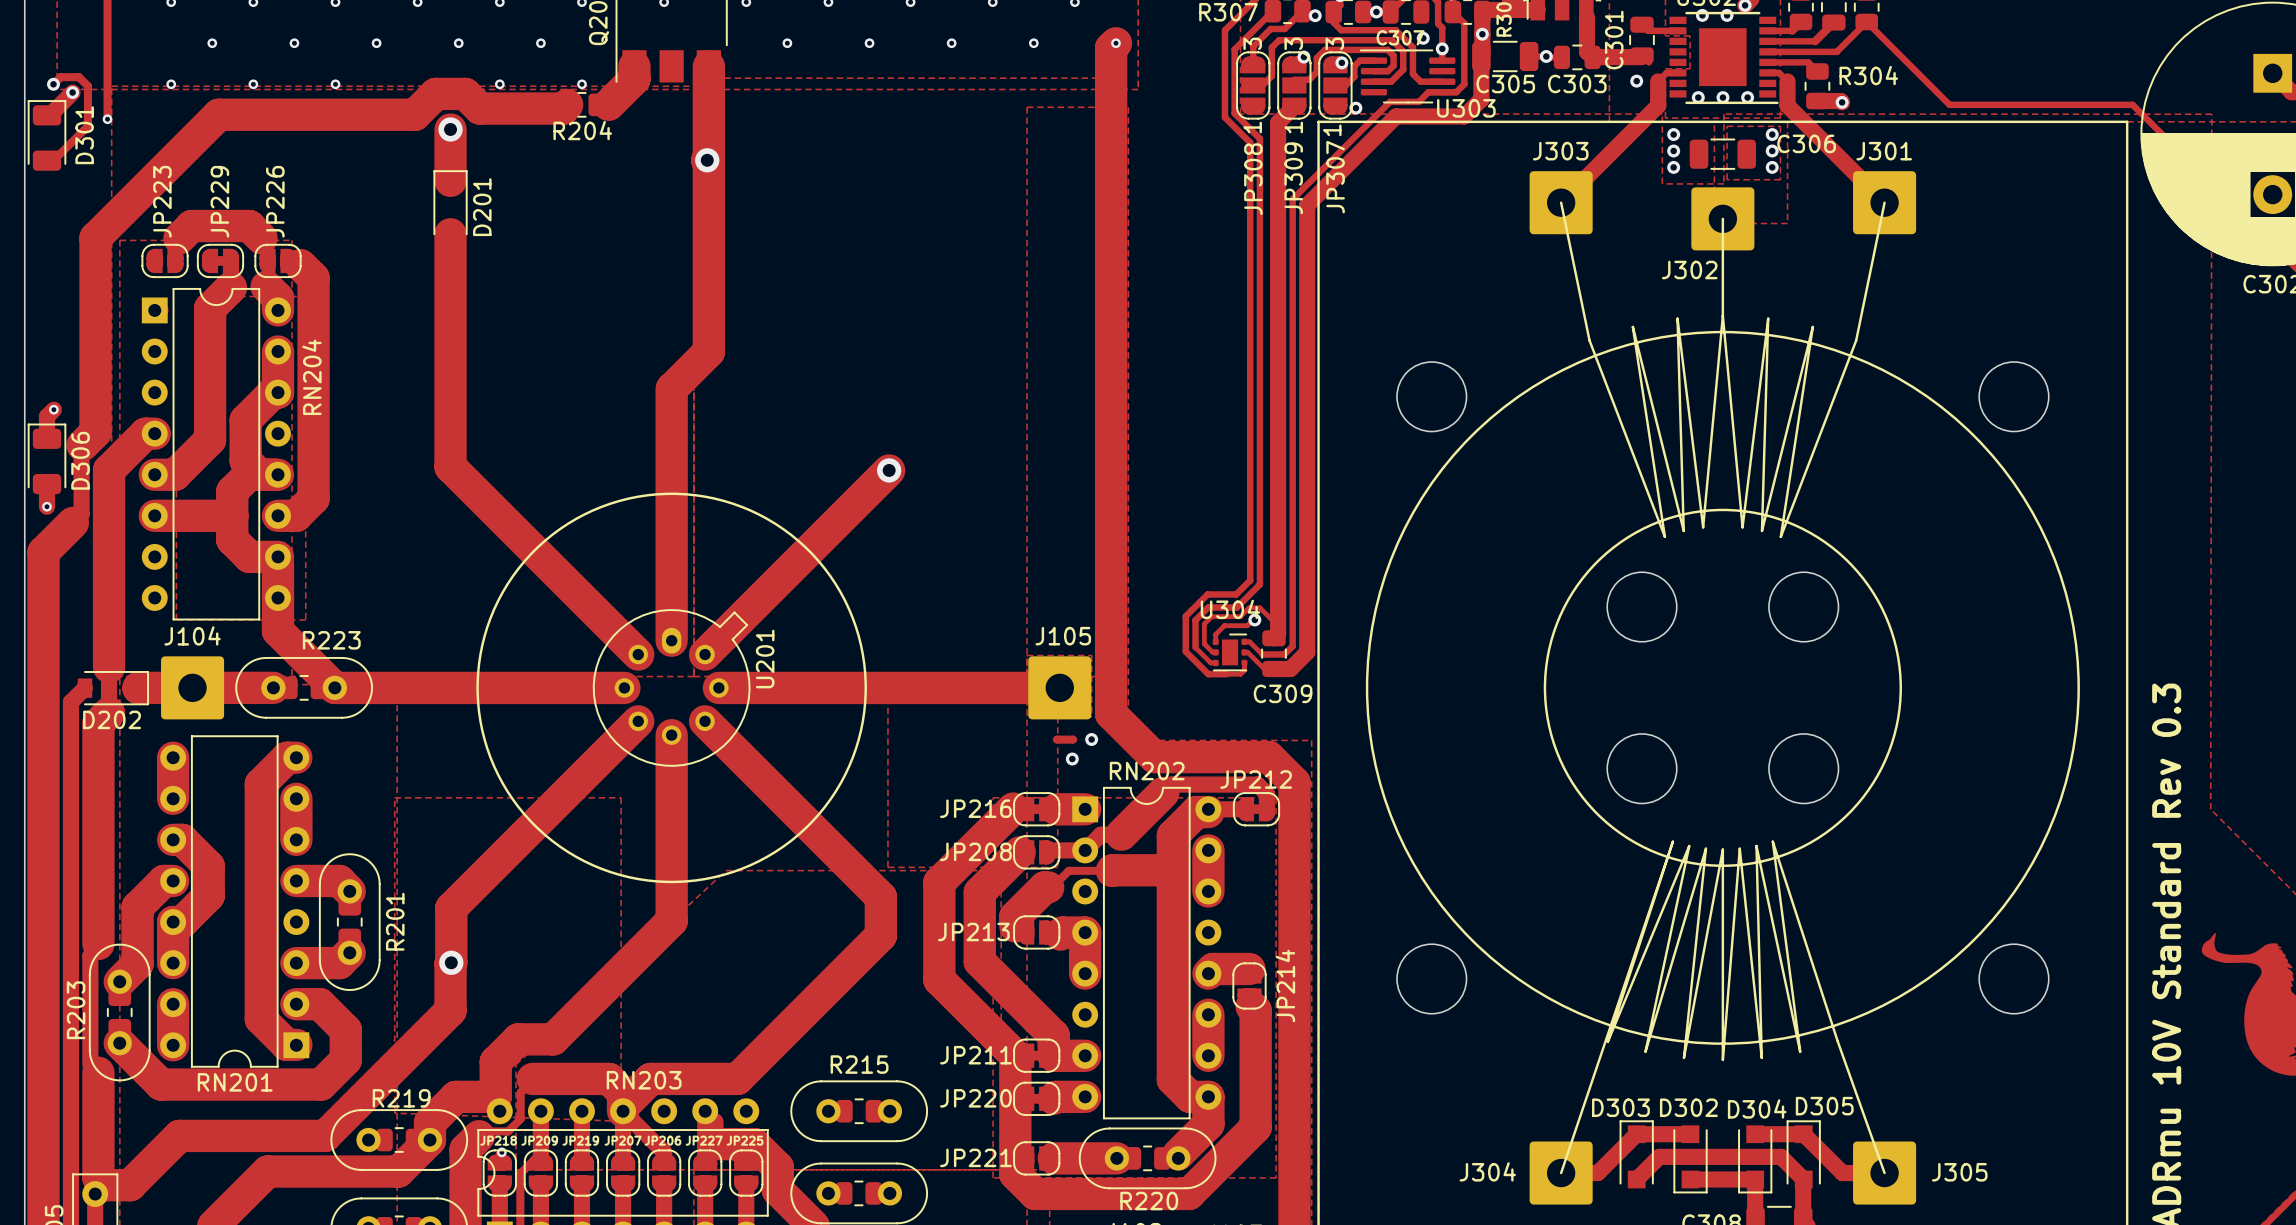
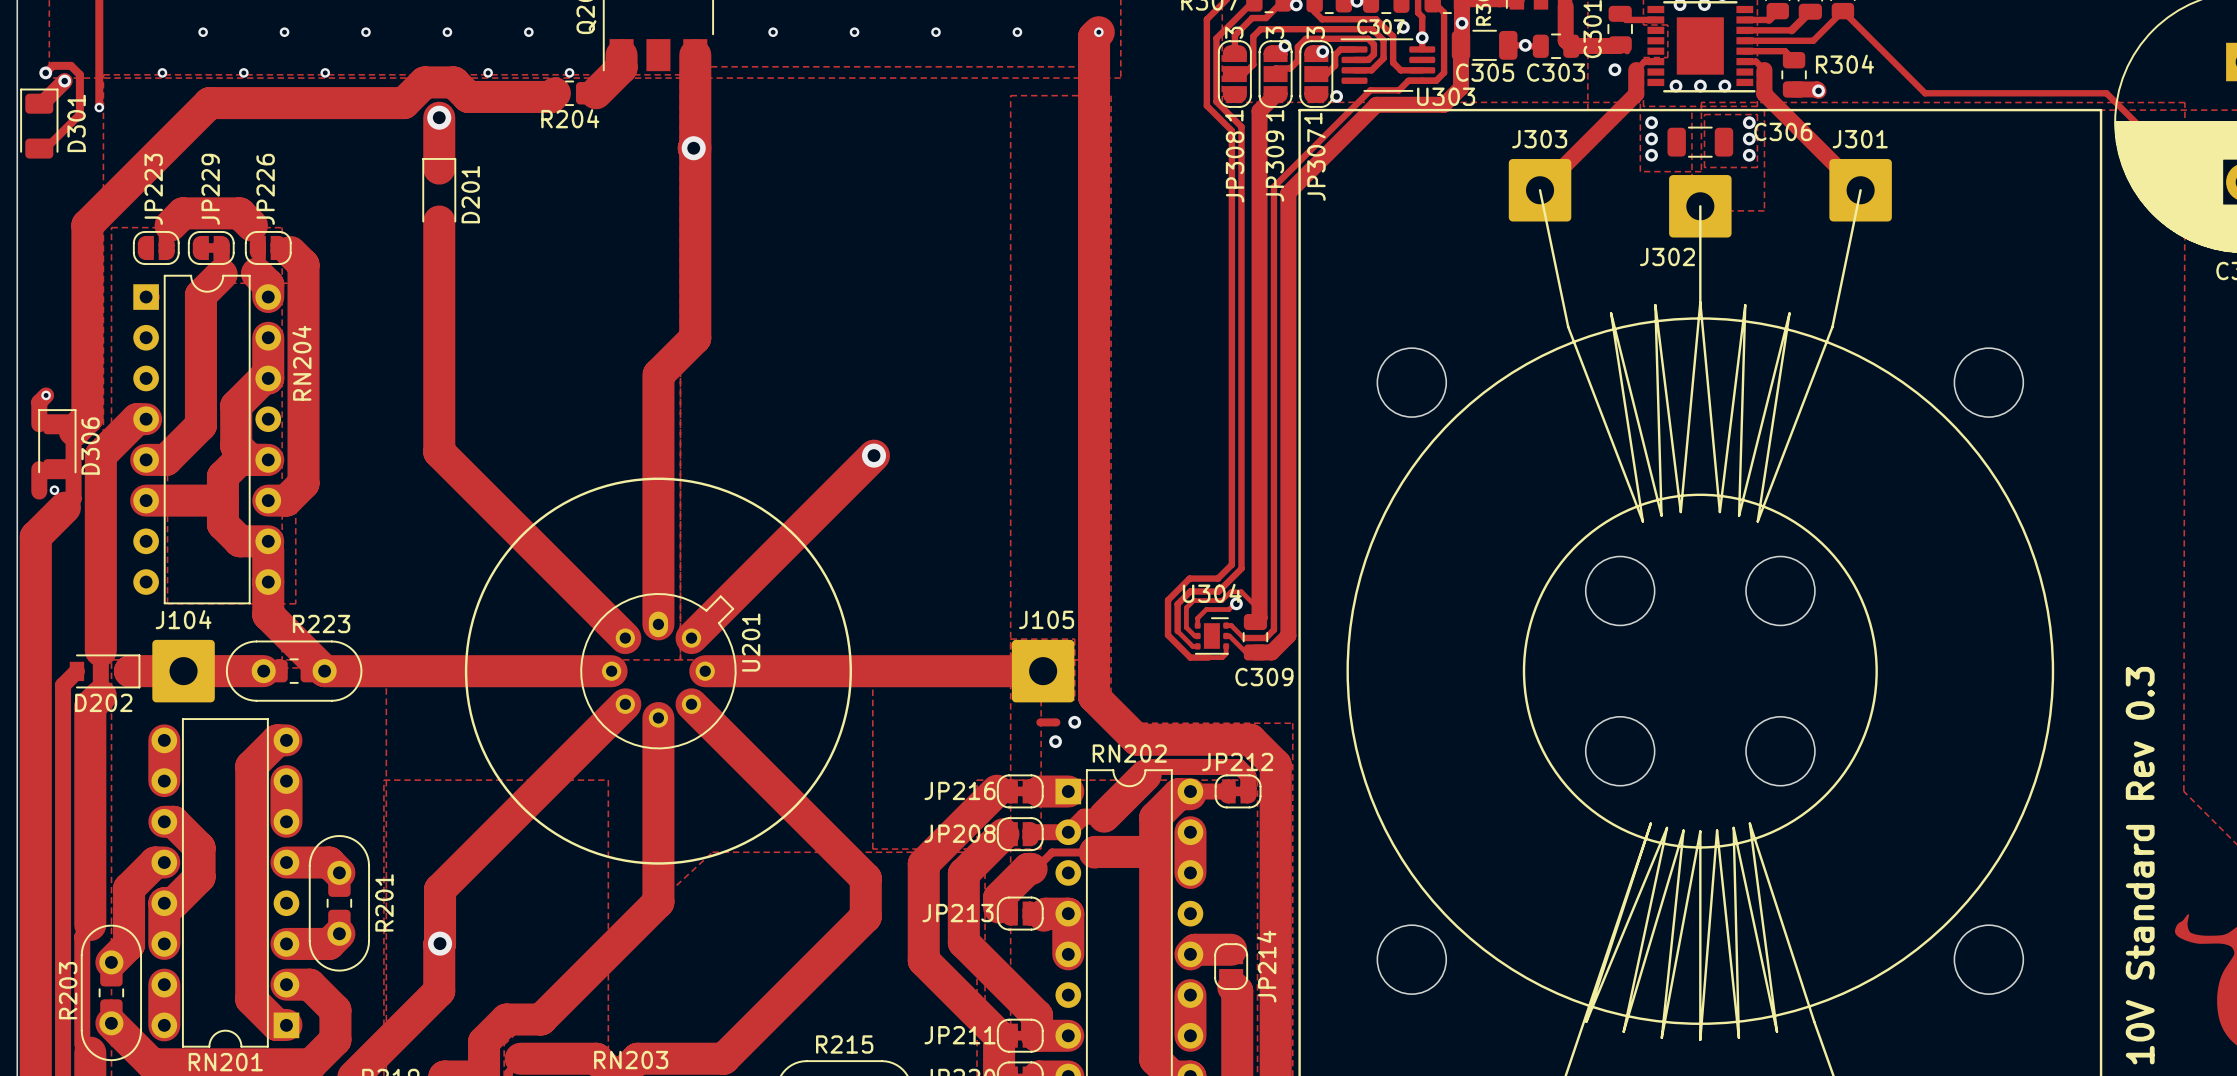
D306 position: (47, 458) -> (57, 444)
via position: (47, 506) -> (54, 490)

